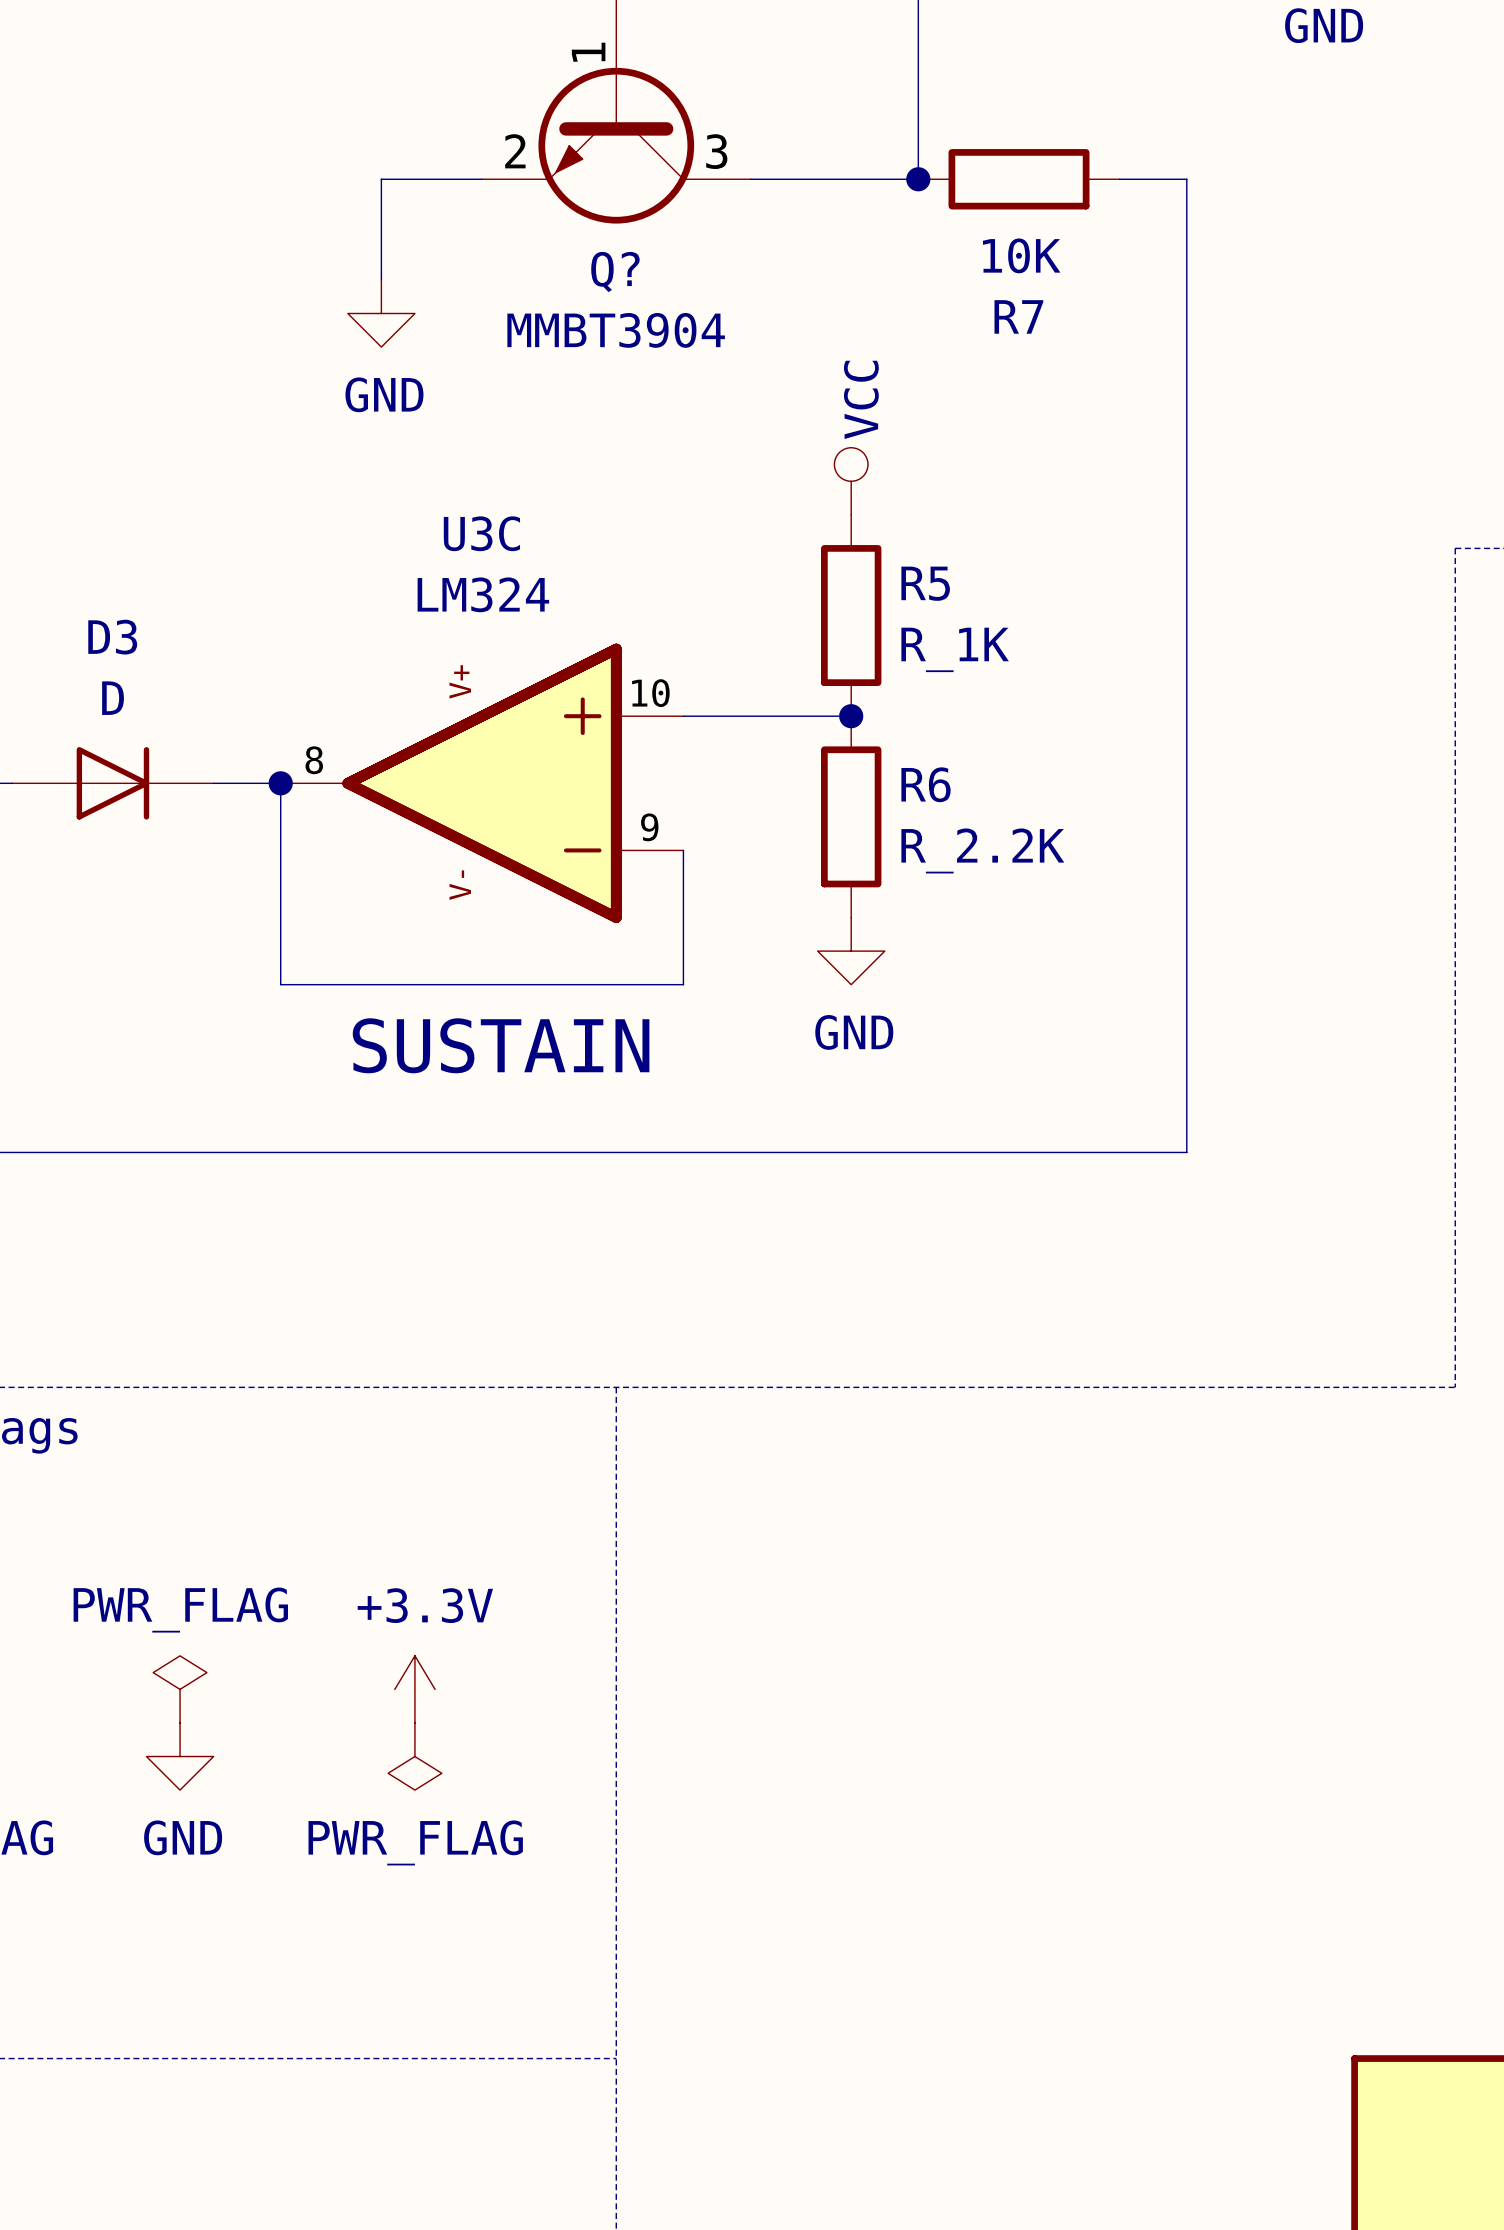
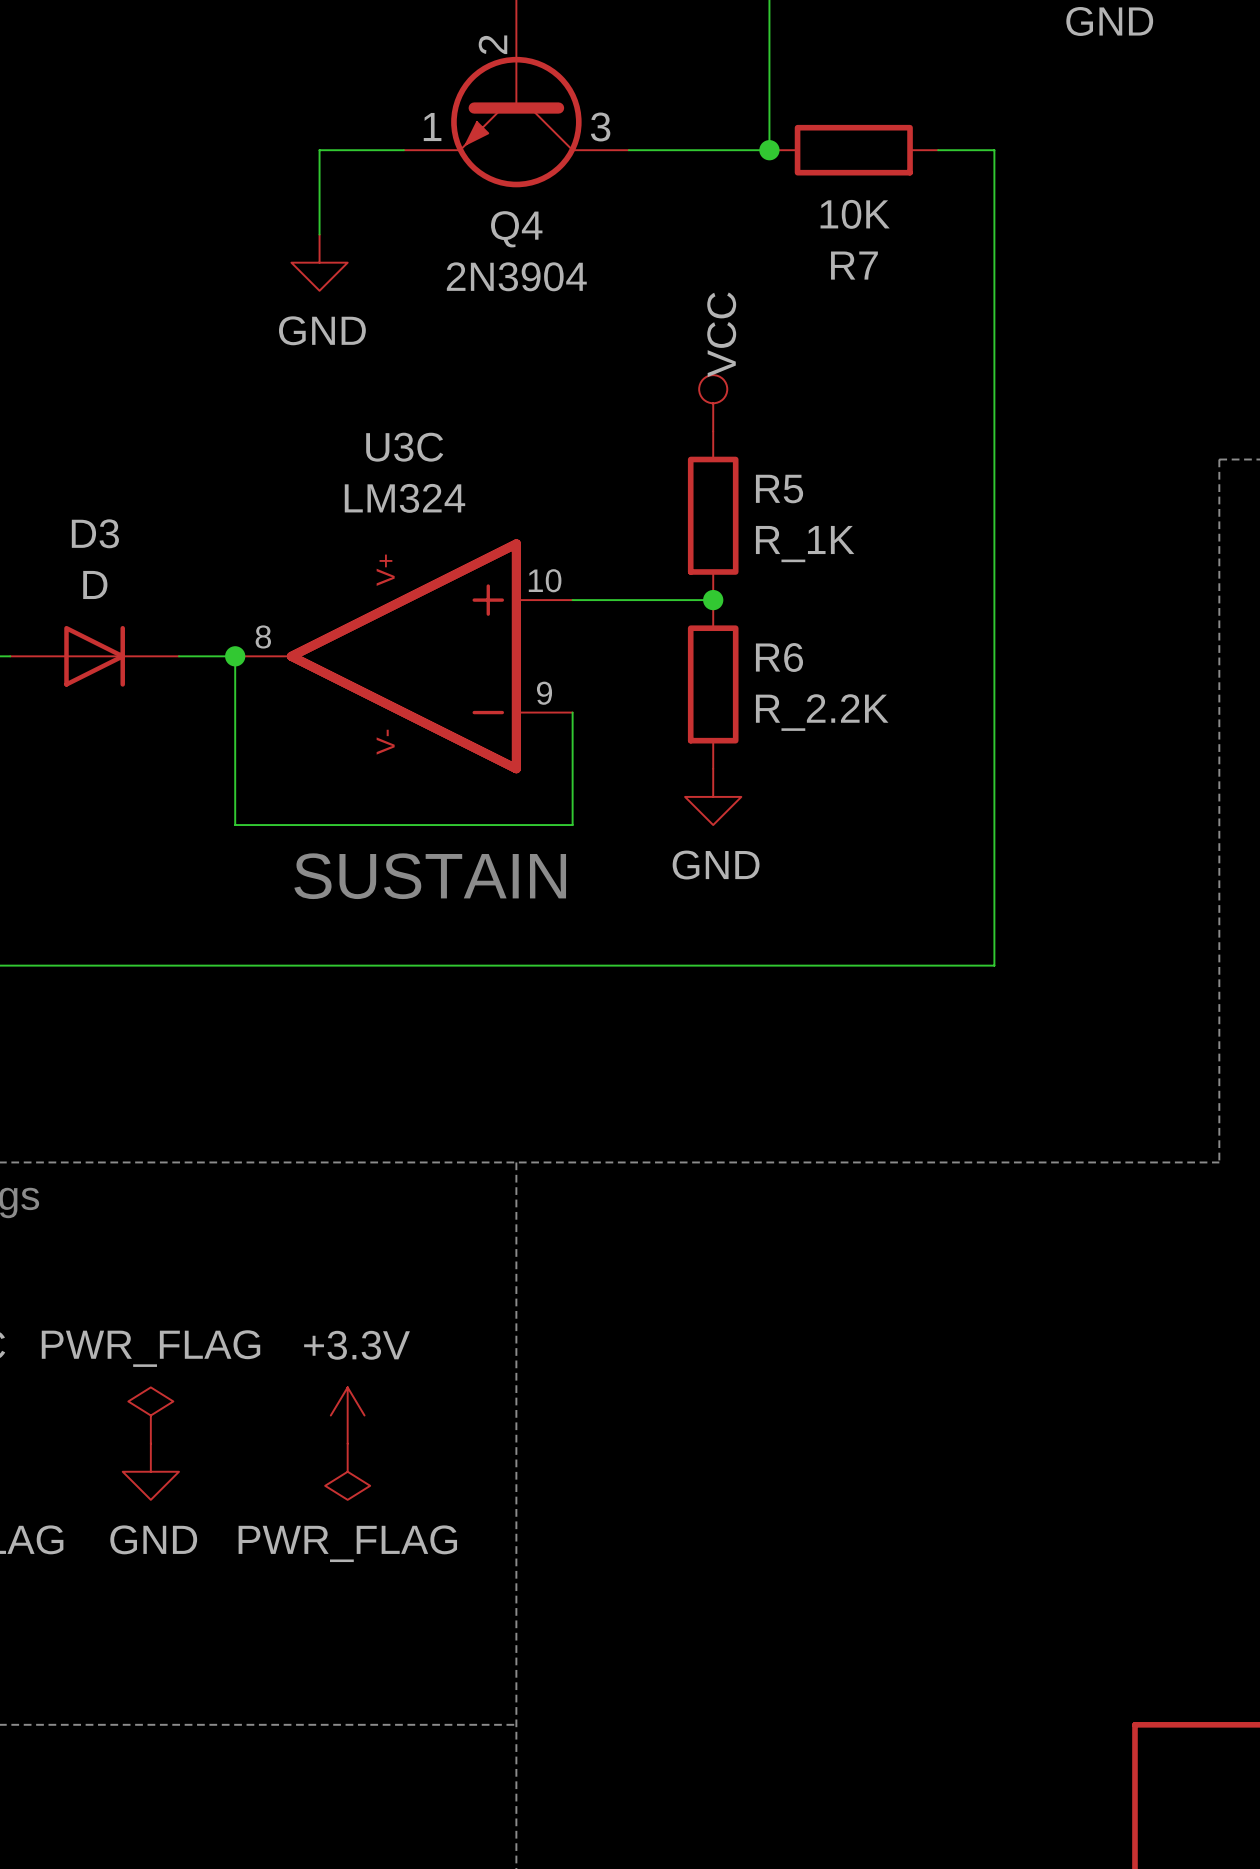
Q? pin number: 1 (588, 52) -> 2 (492, 44)
Q? pin number: 2 (515, 151) -> 1 (432, 127)
Q? name: Q? (615, 272) -> Q4 (516, 229)
Q? value: MMBT3904 (616, 330) -> 2N3904 (516, 276)

